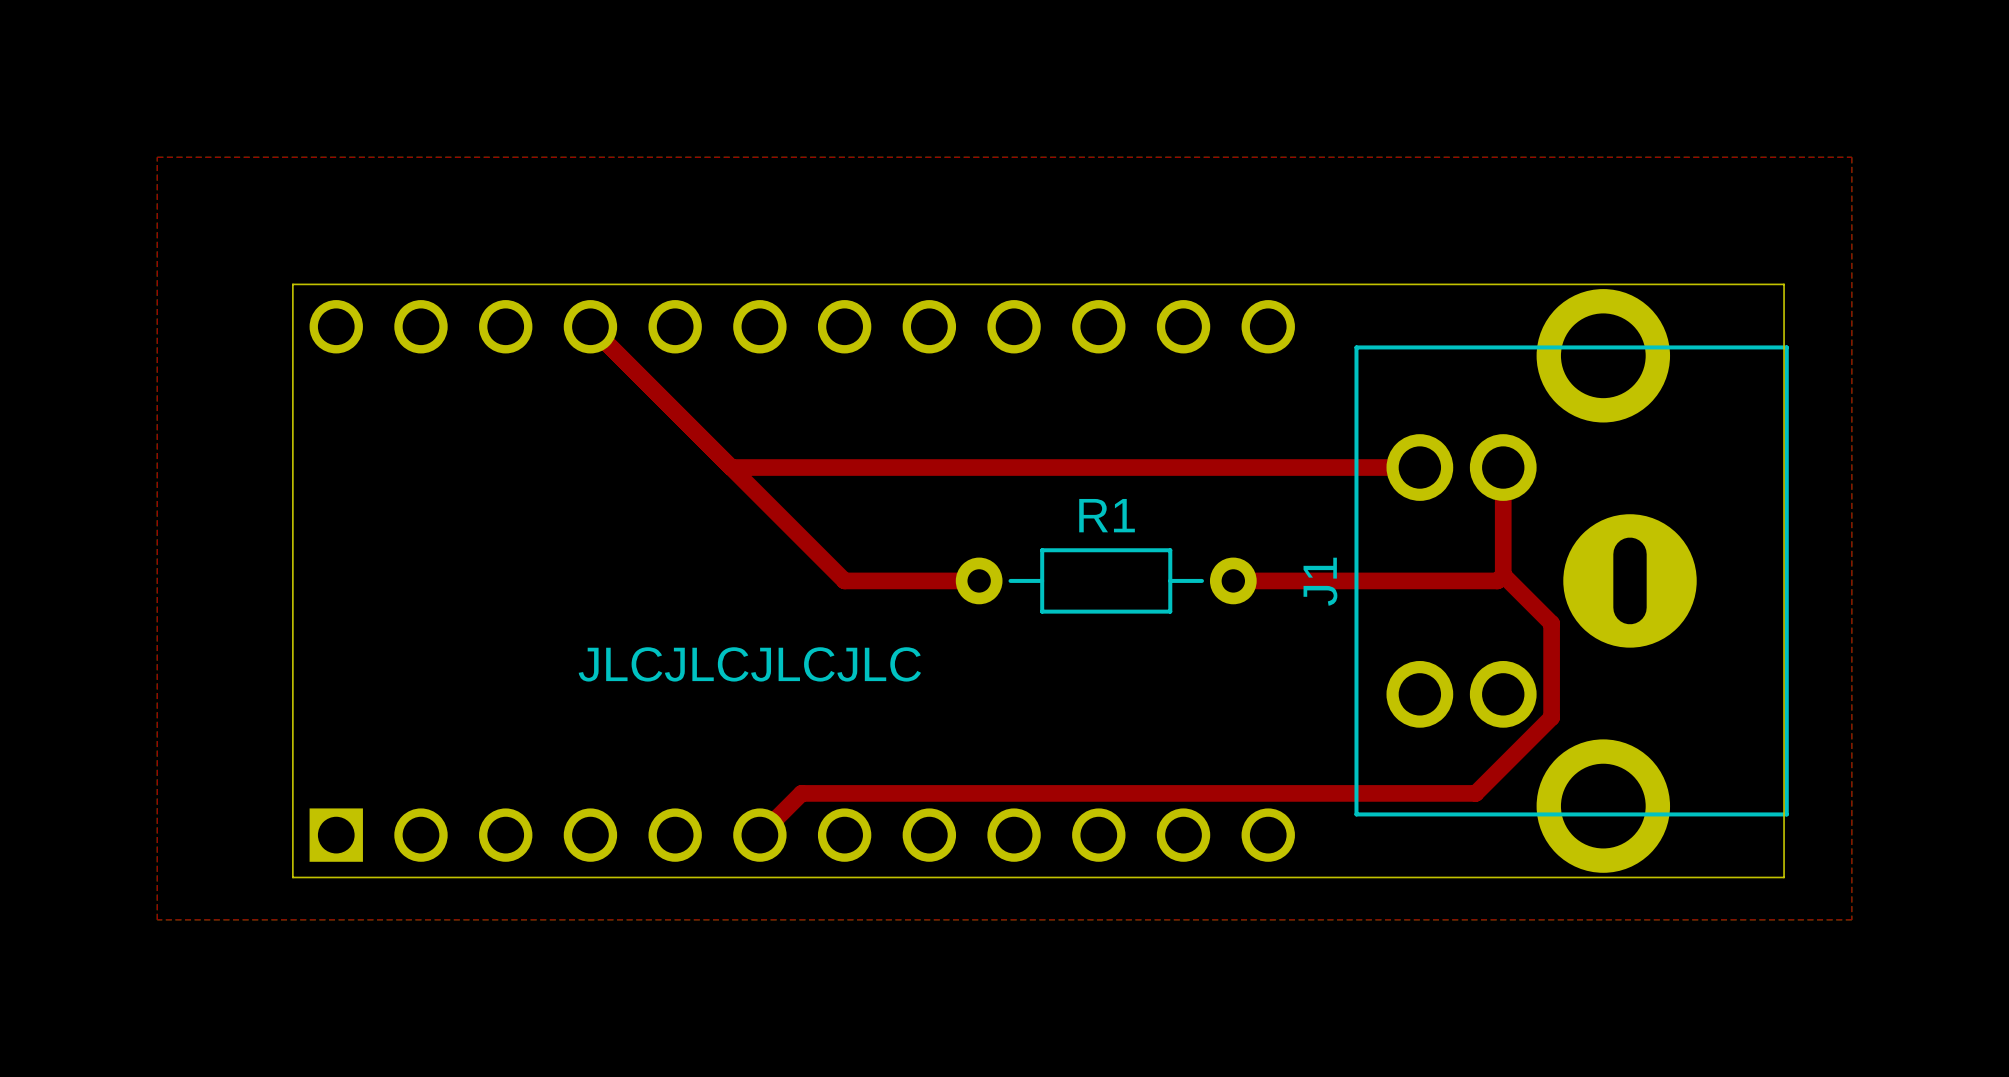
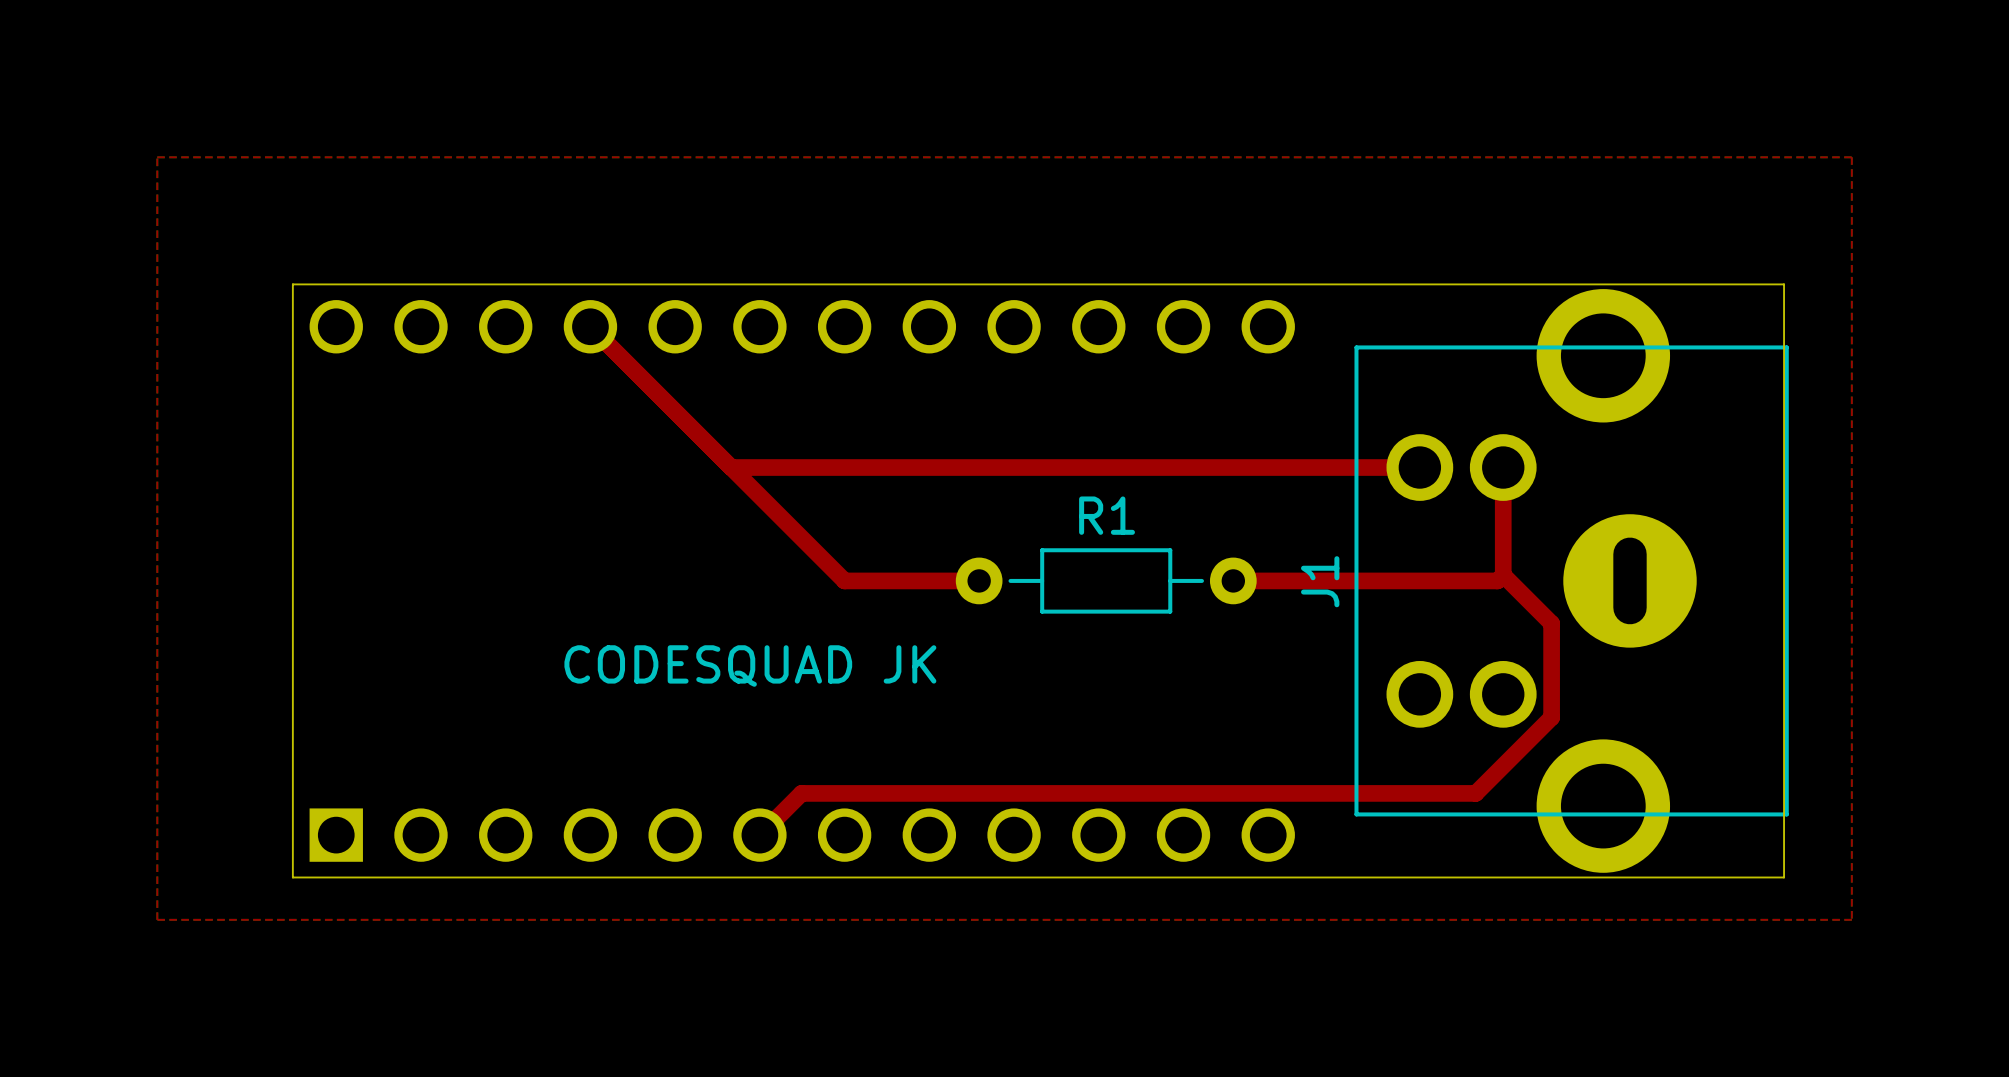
text: JLCJLCJLCJLC (749, 664) -> CODESQUAD JK (750, 666)

